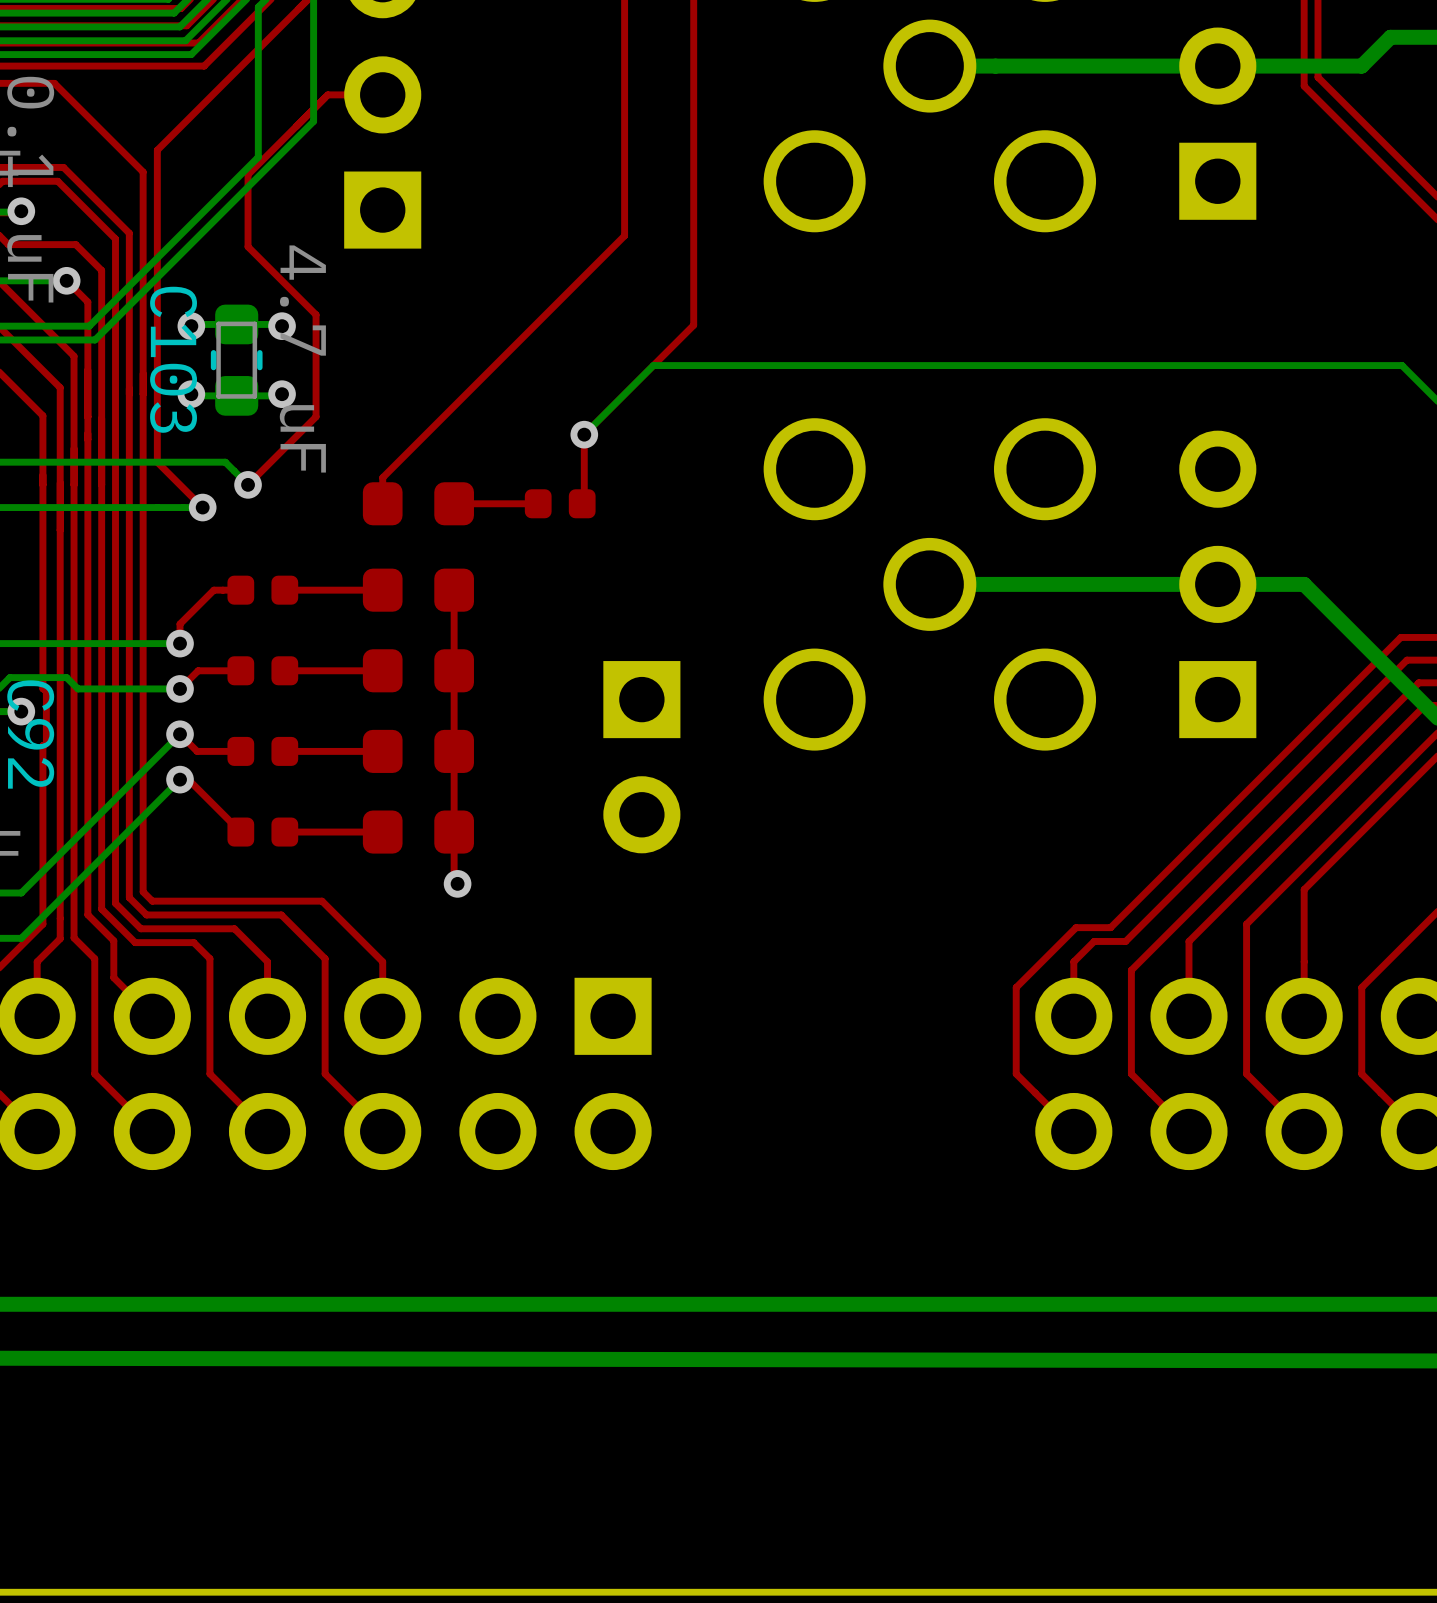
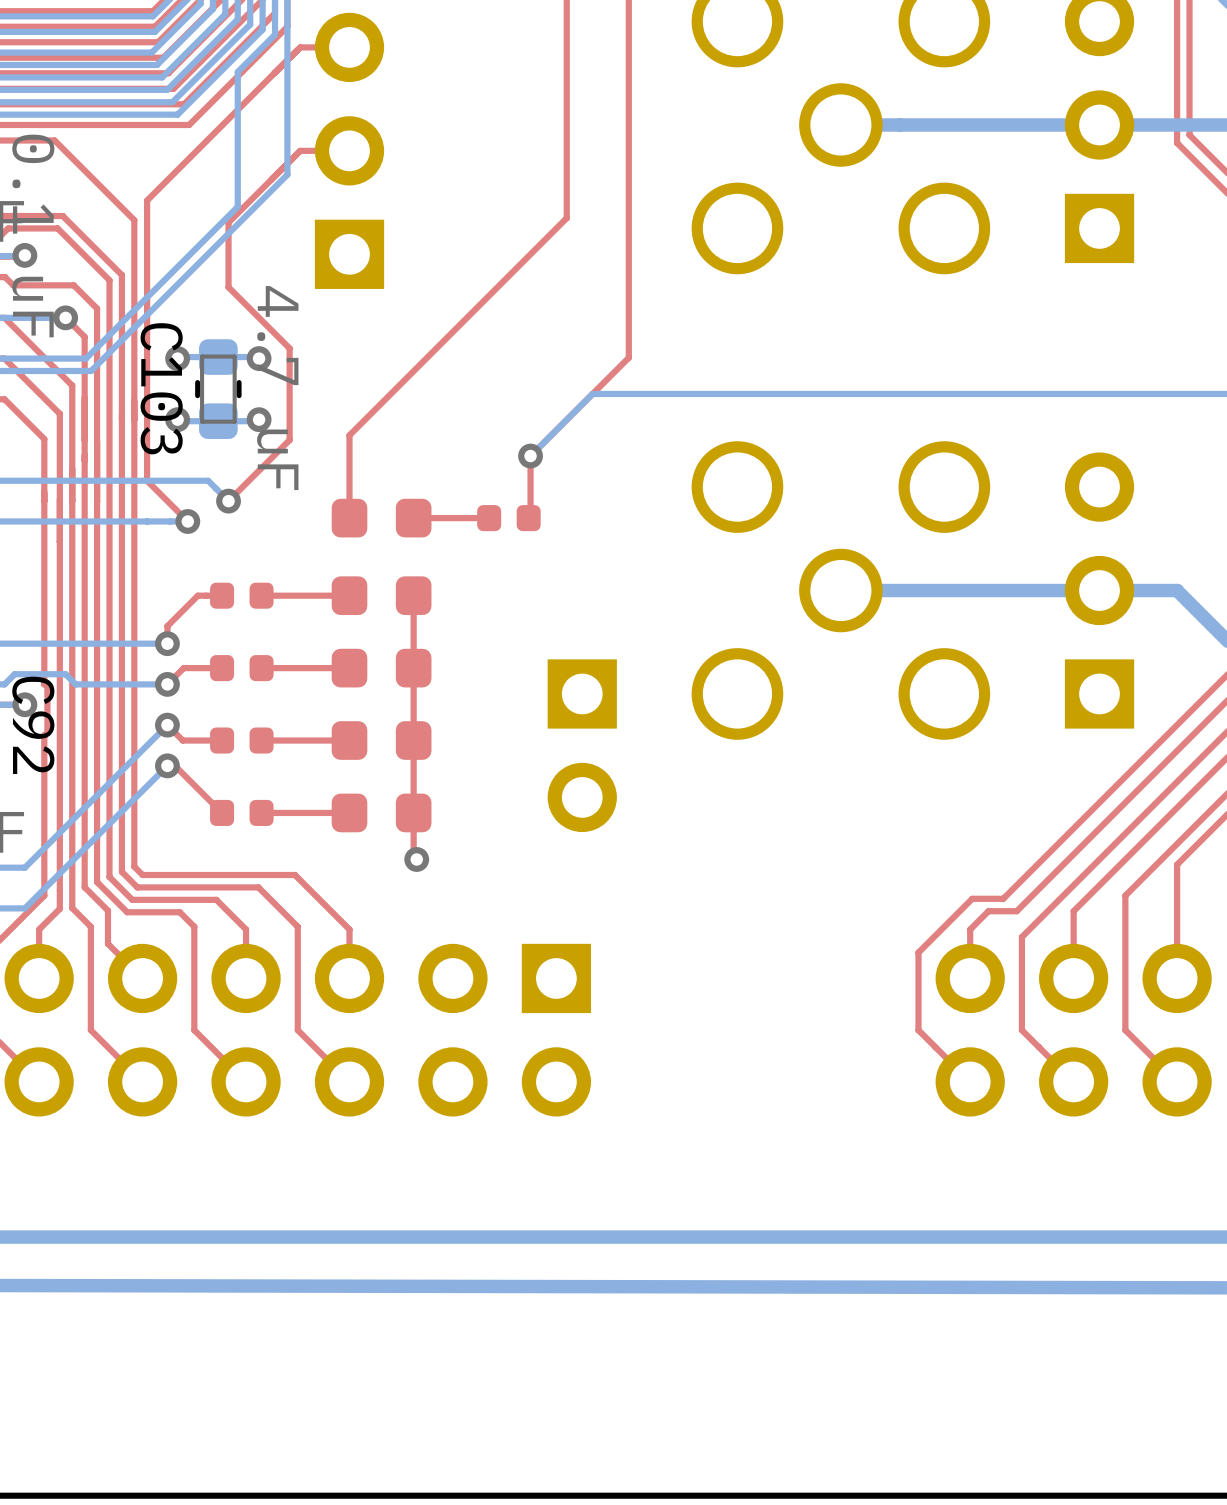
top track: (624, 169) (624, 235) (382, 477) -> (566, 218) (349, 435) (349, 494)

